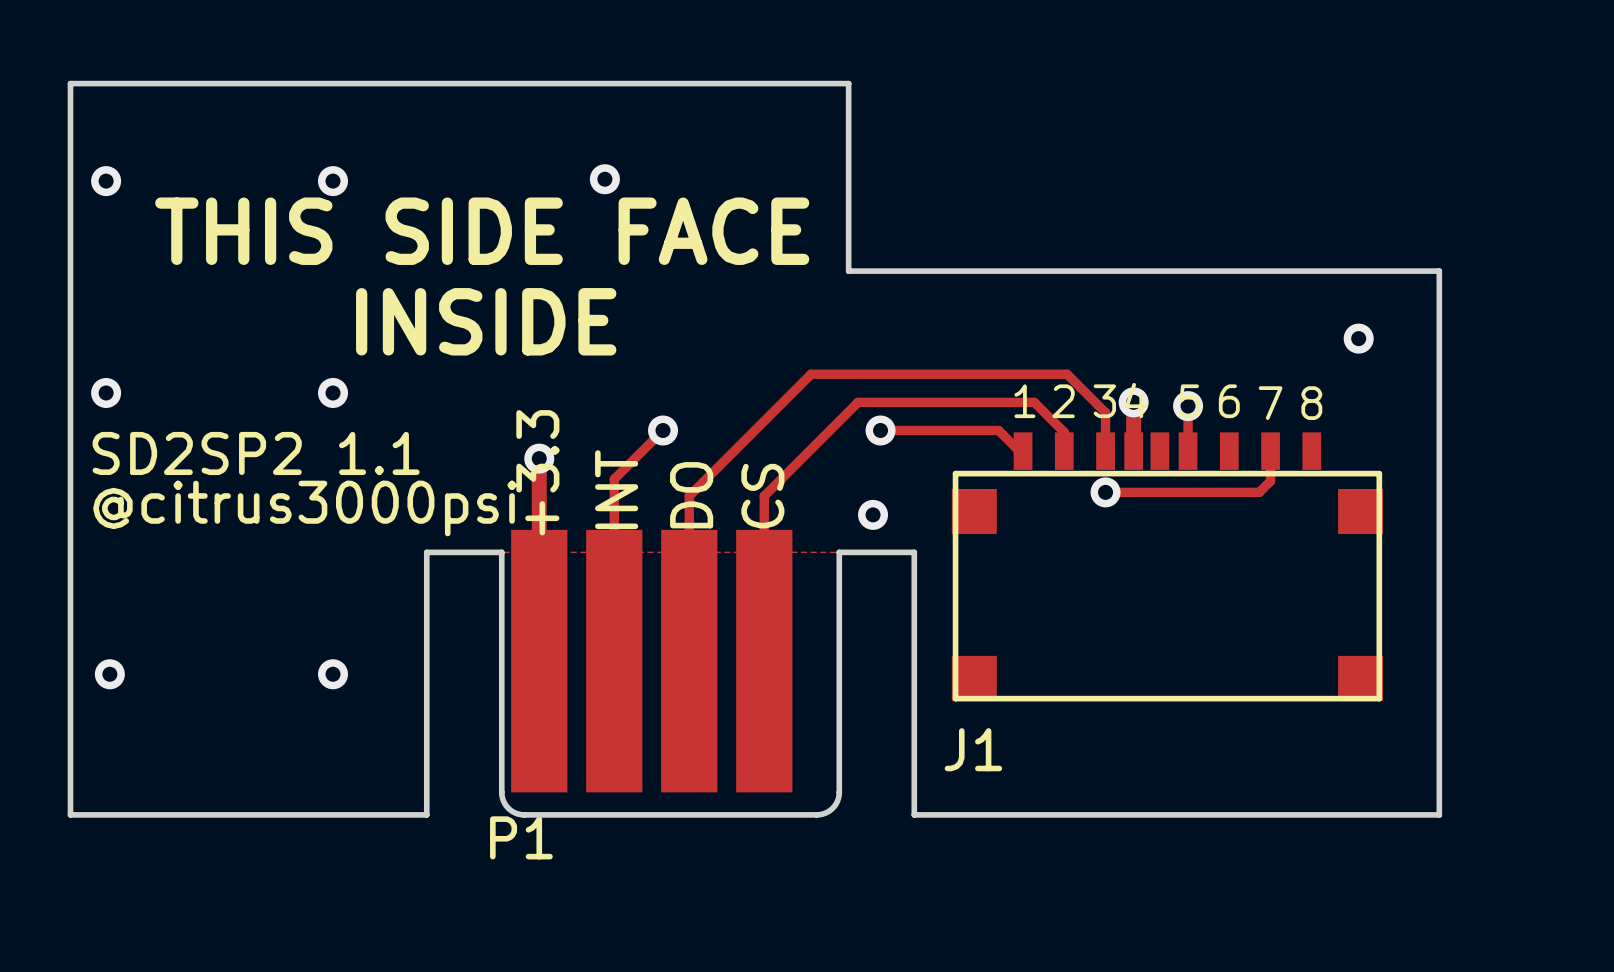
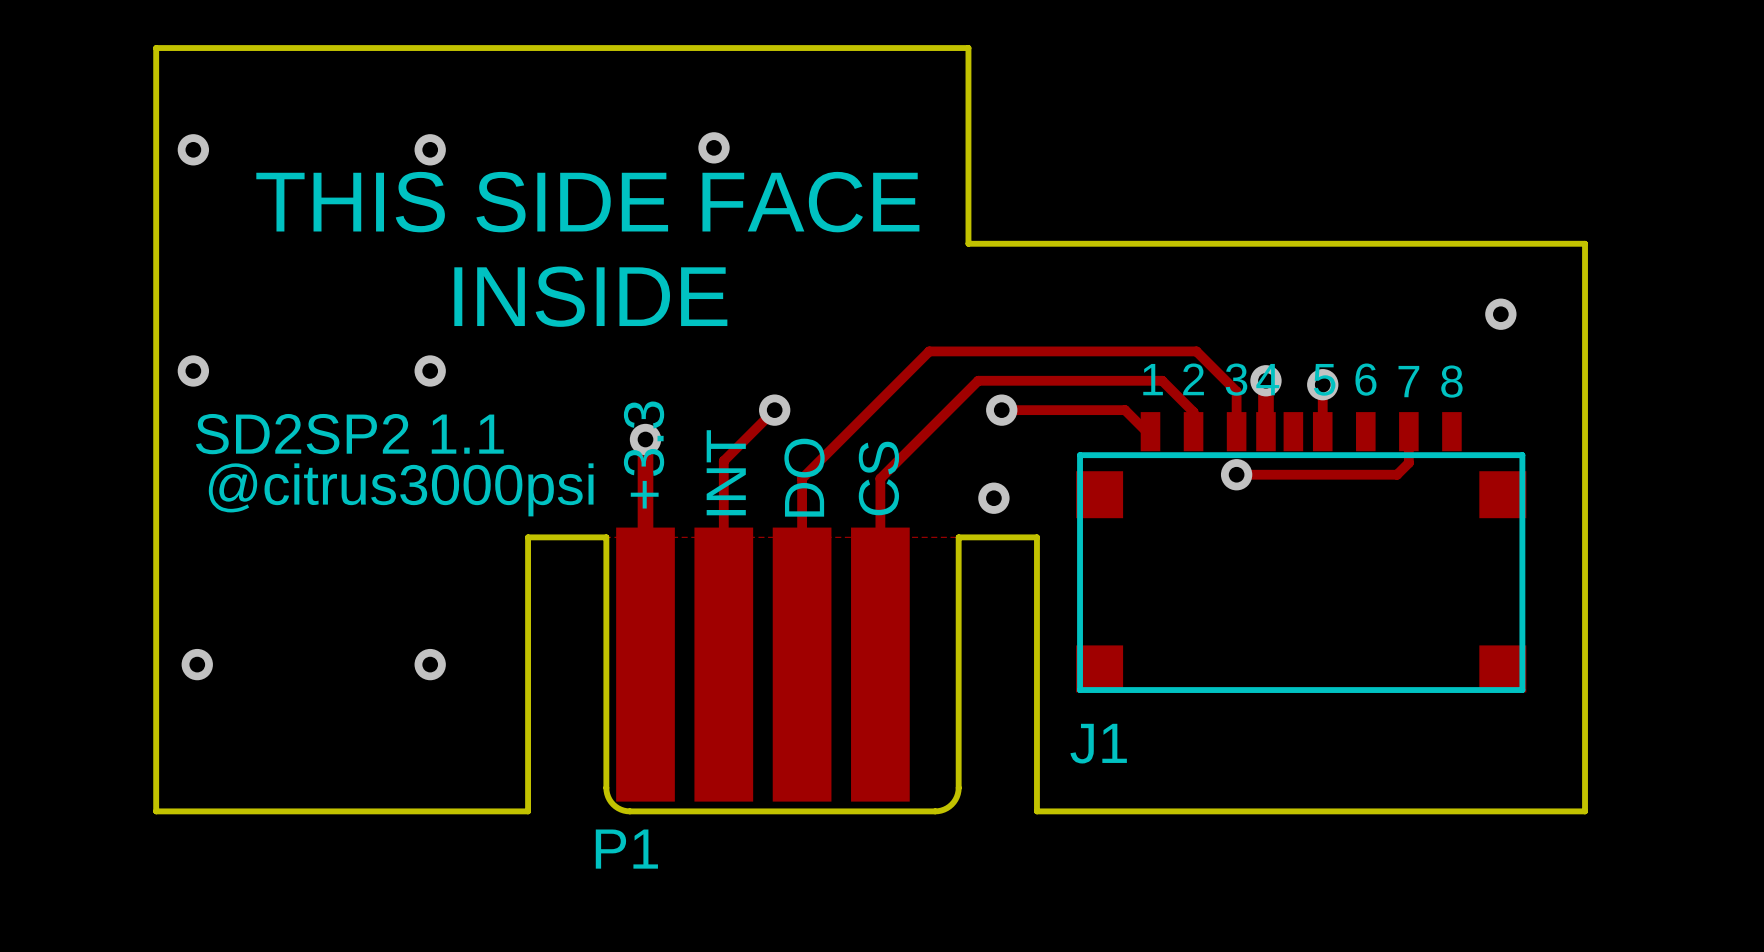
P1 position: (651, 661) -> (762, 664)

